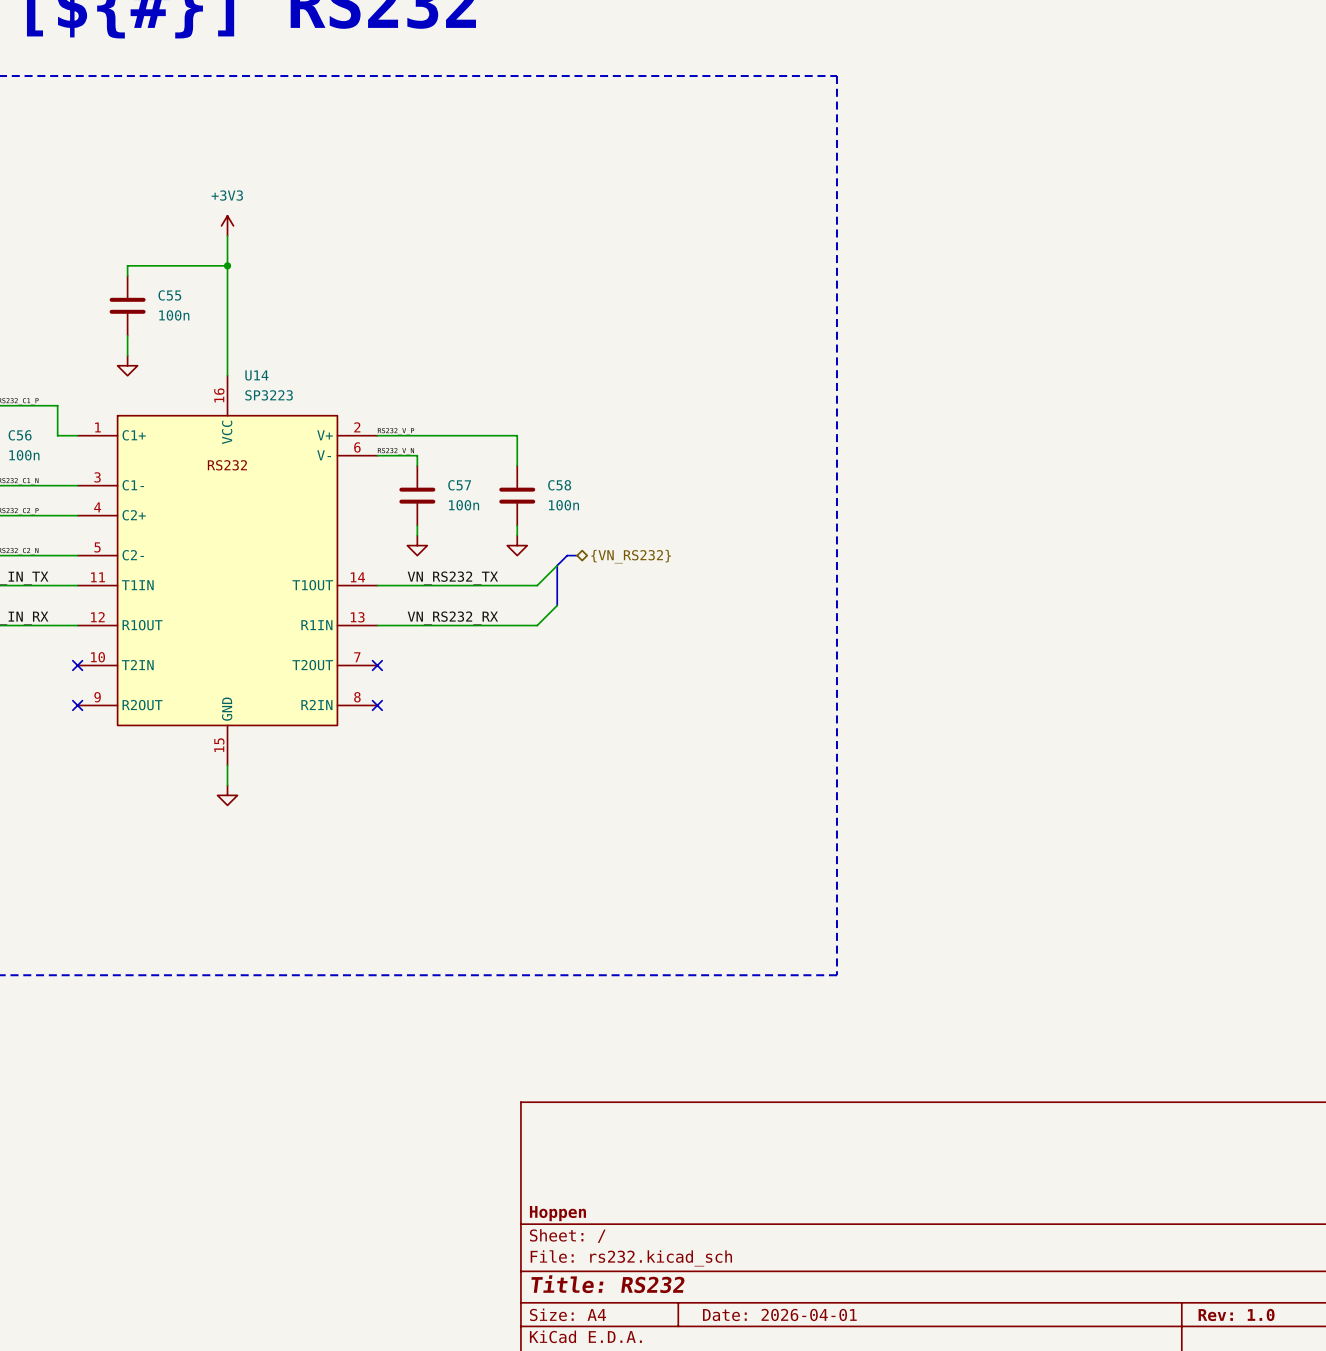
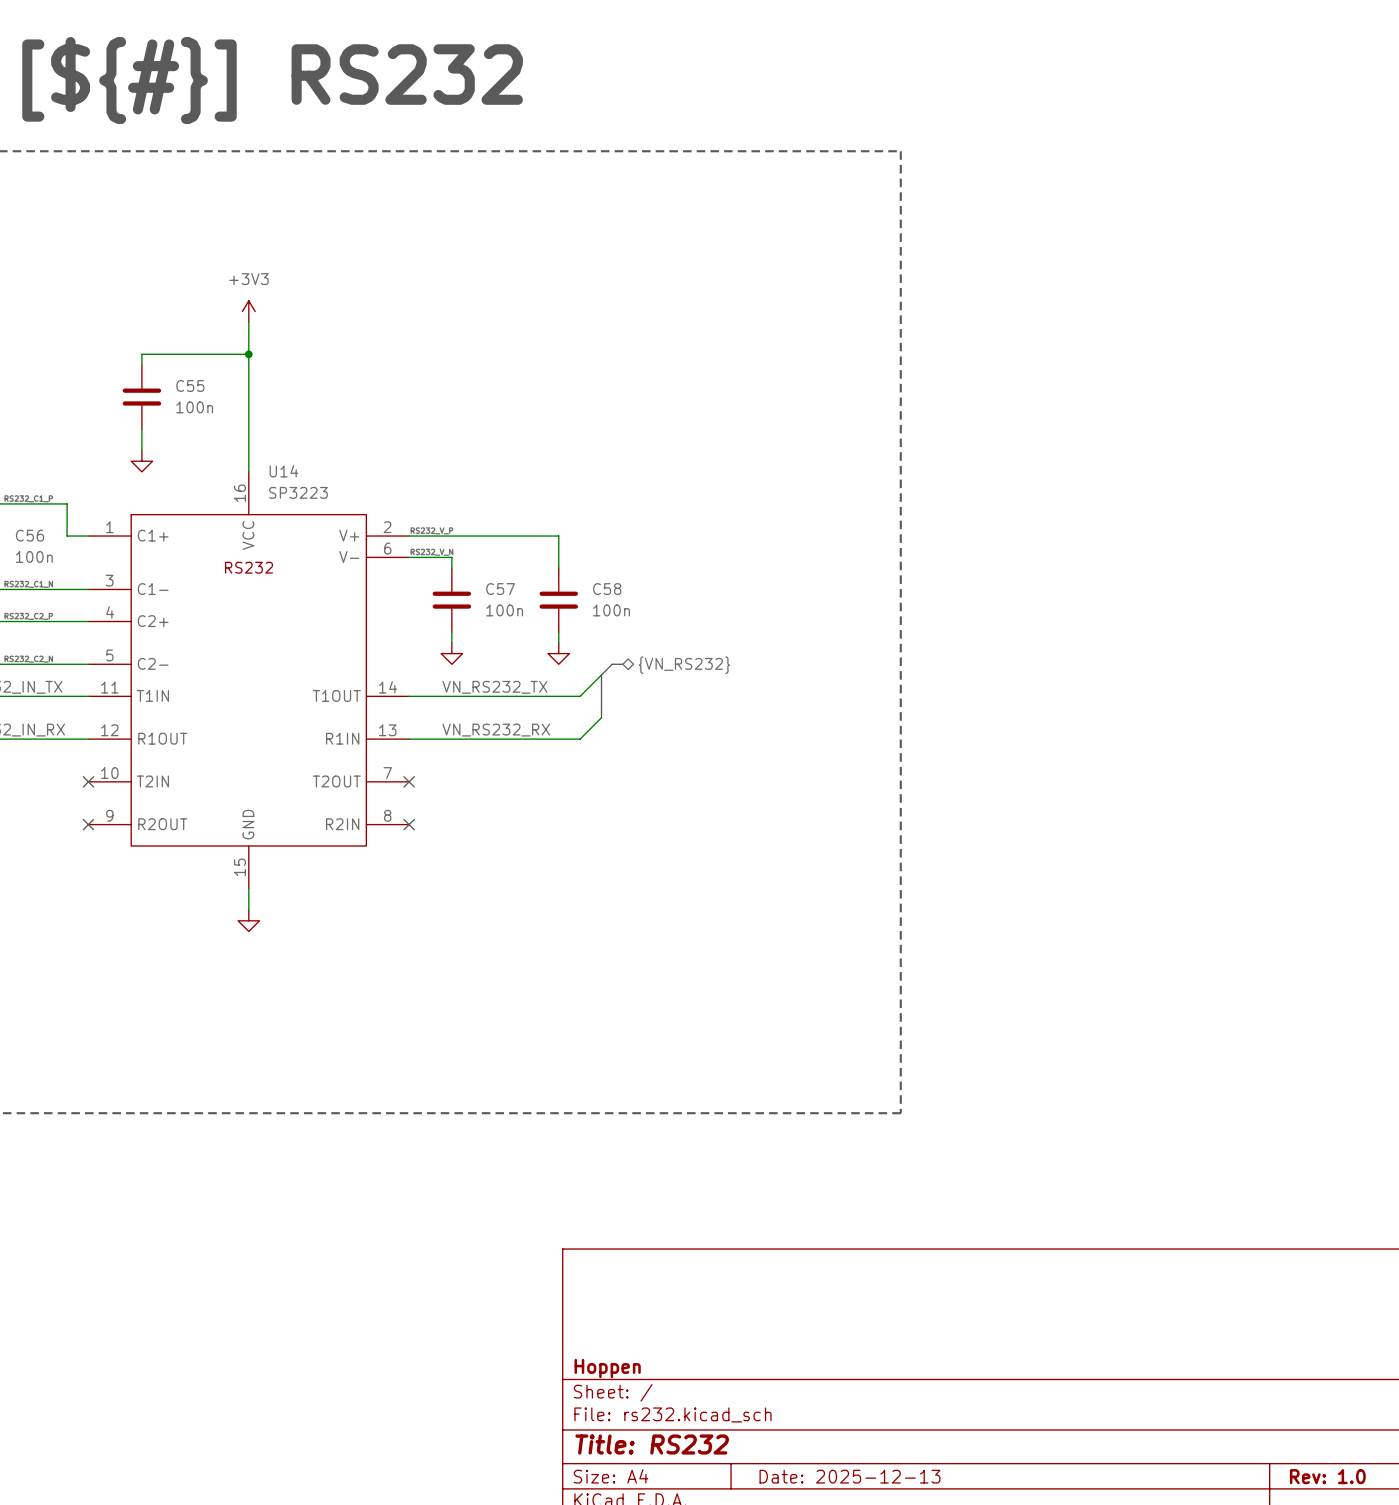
title block: Date: 2026-04-01 (779, 1314) -> Date: 2025-12-13 (850, 1476)

